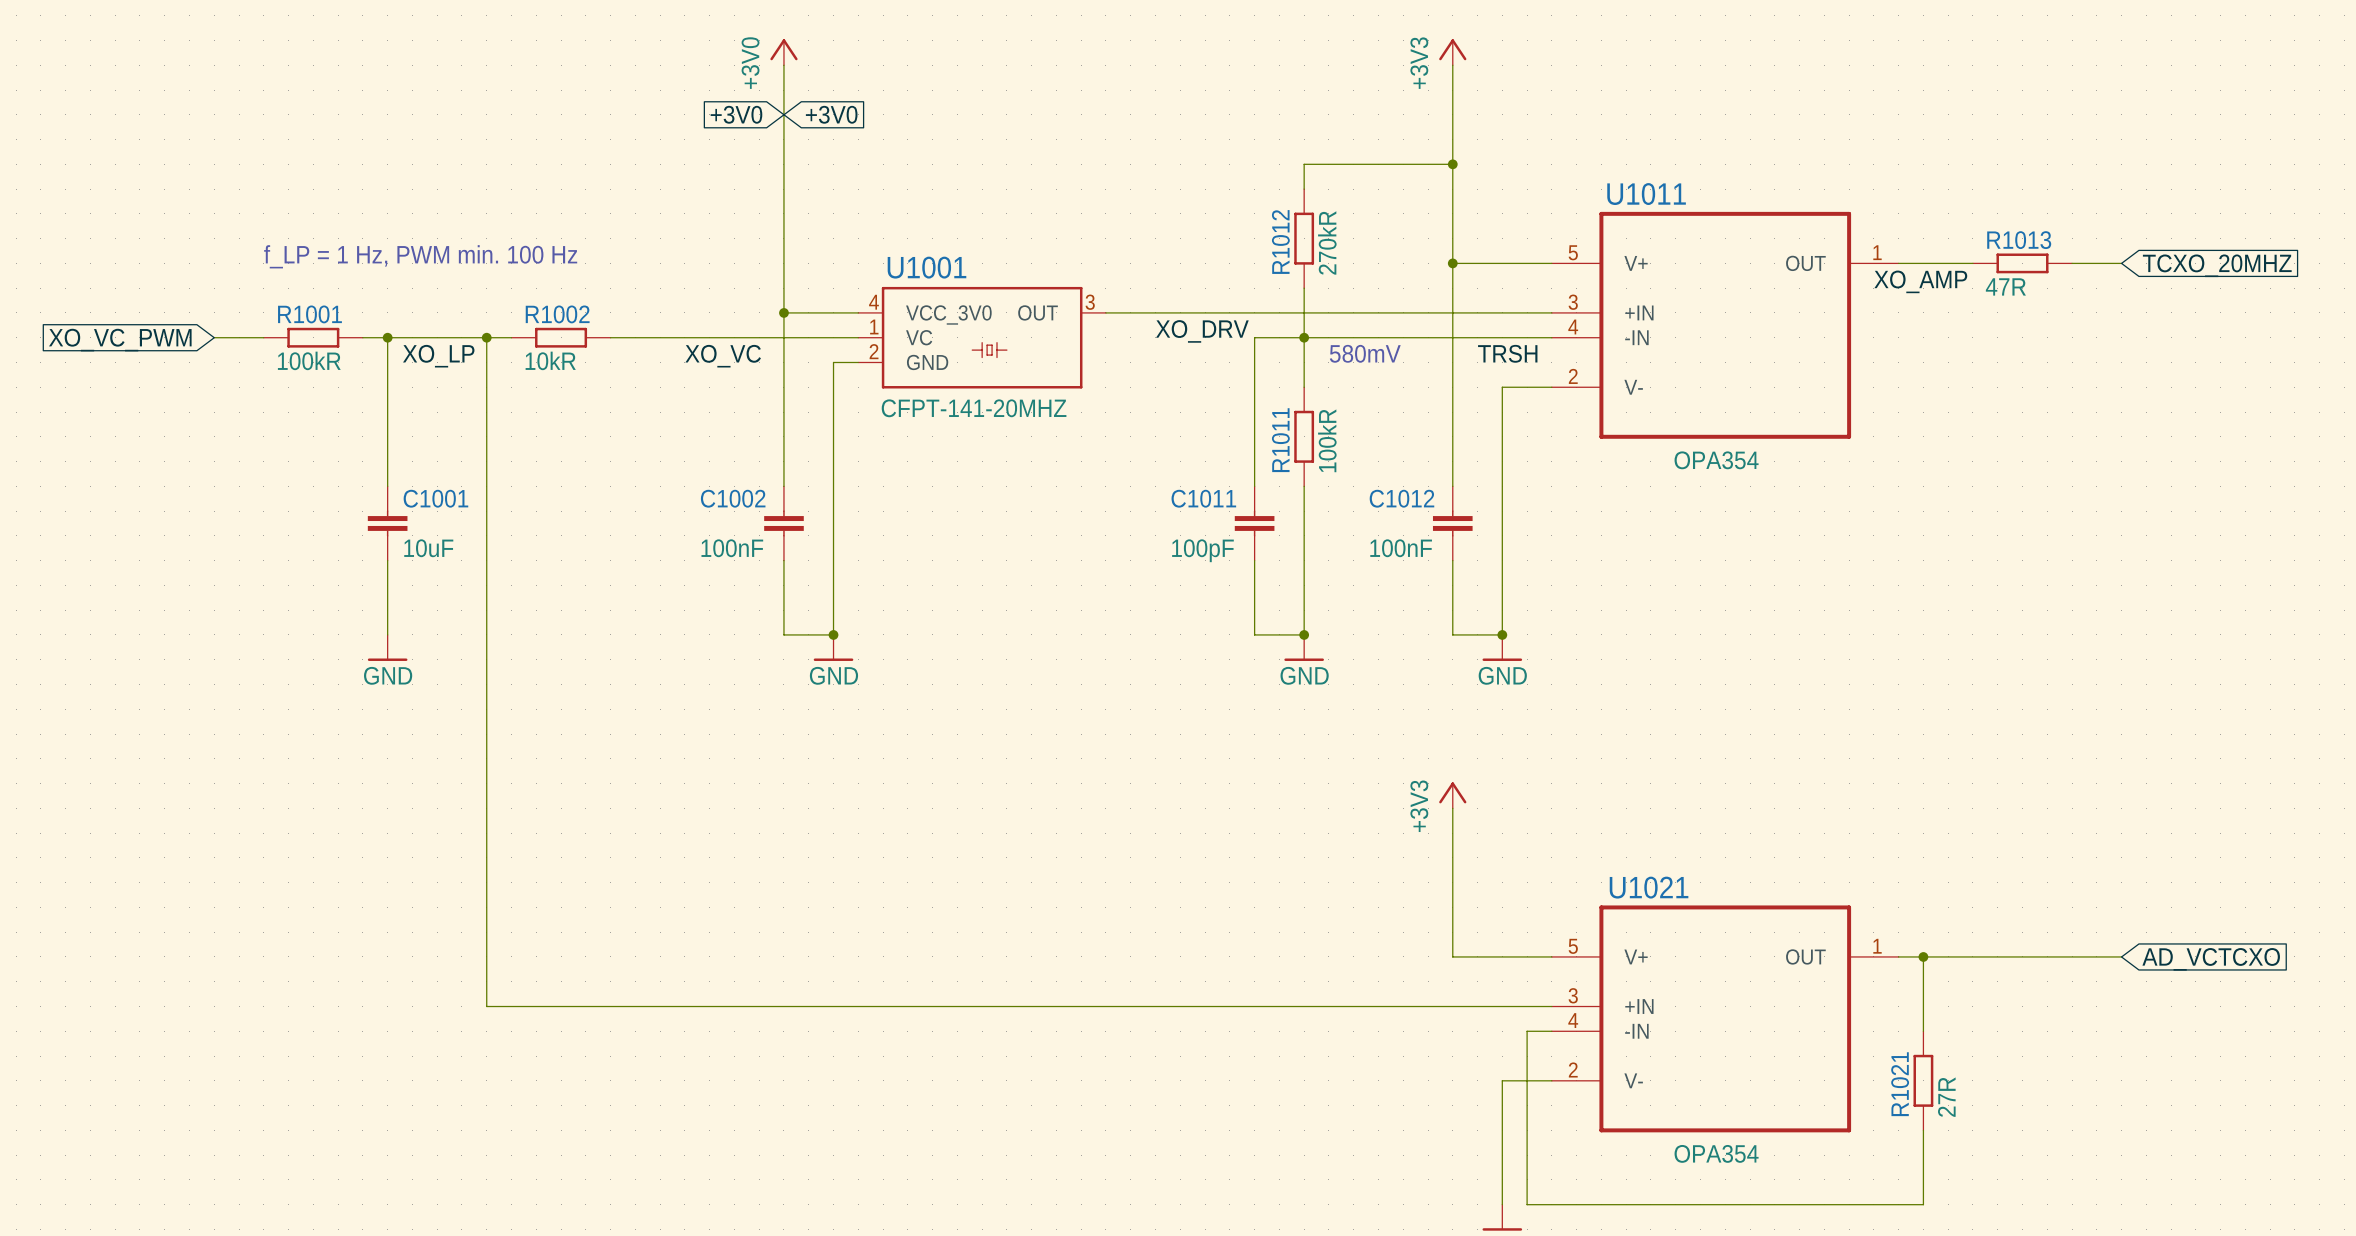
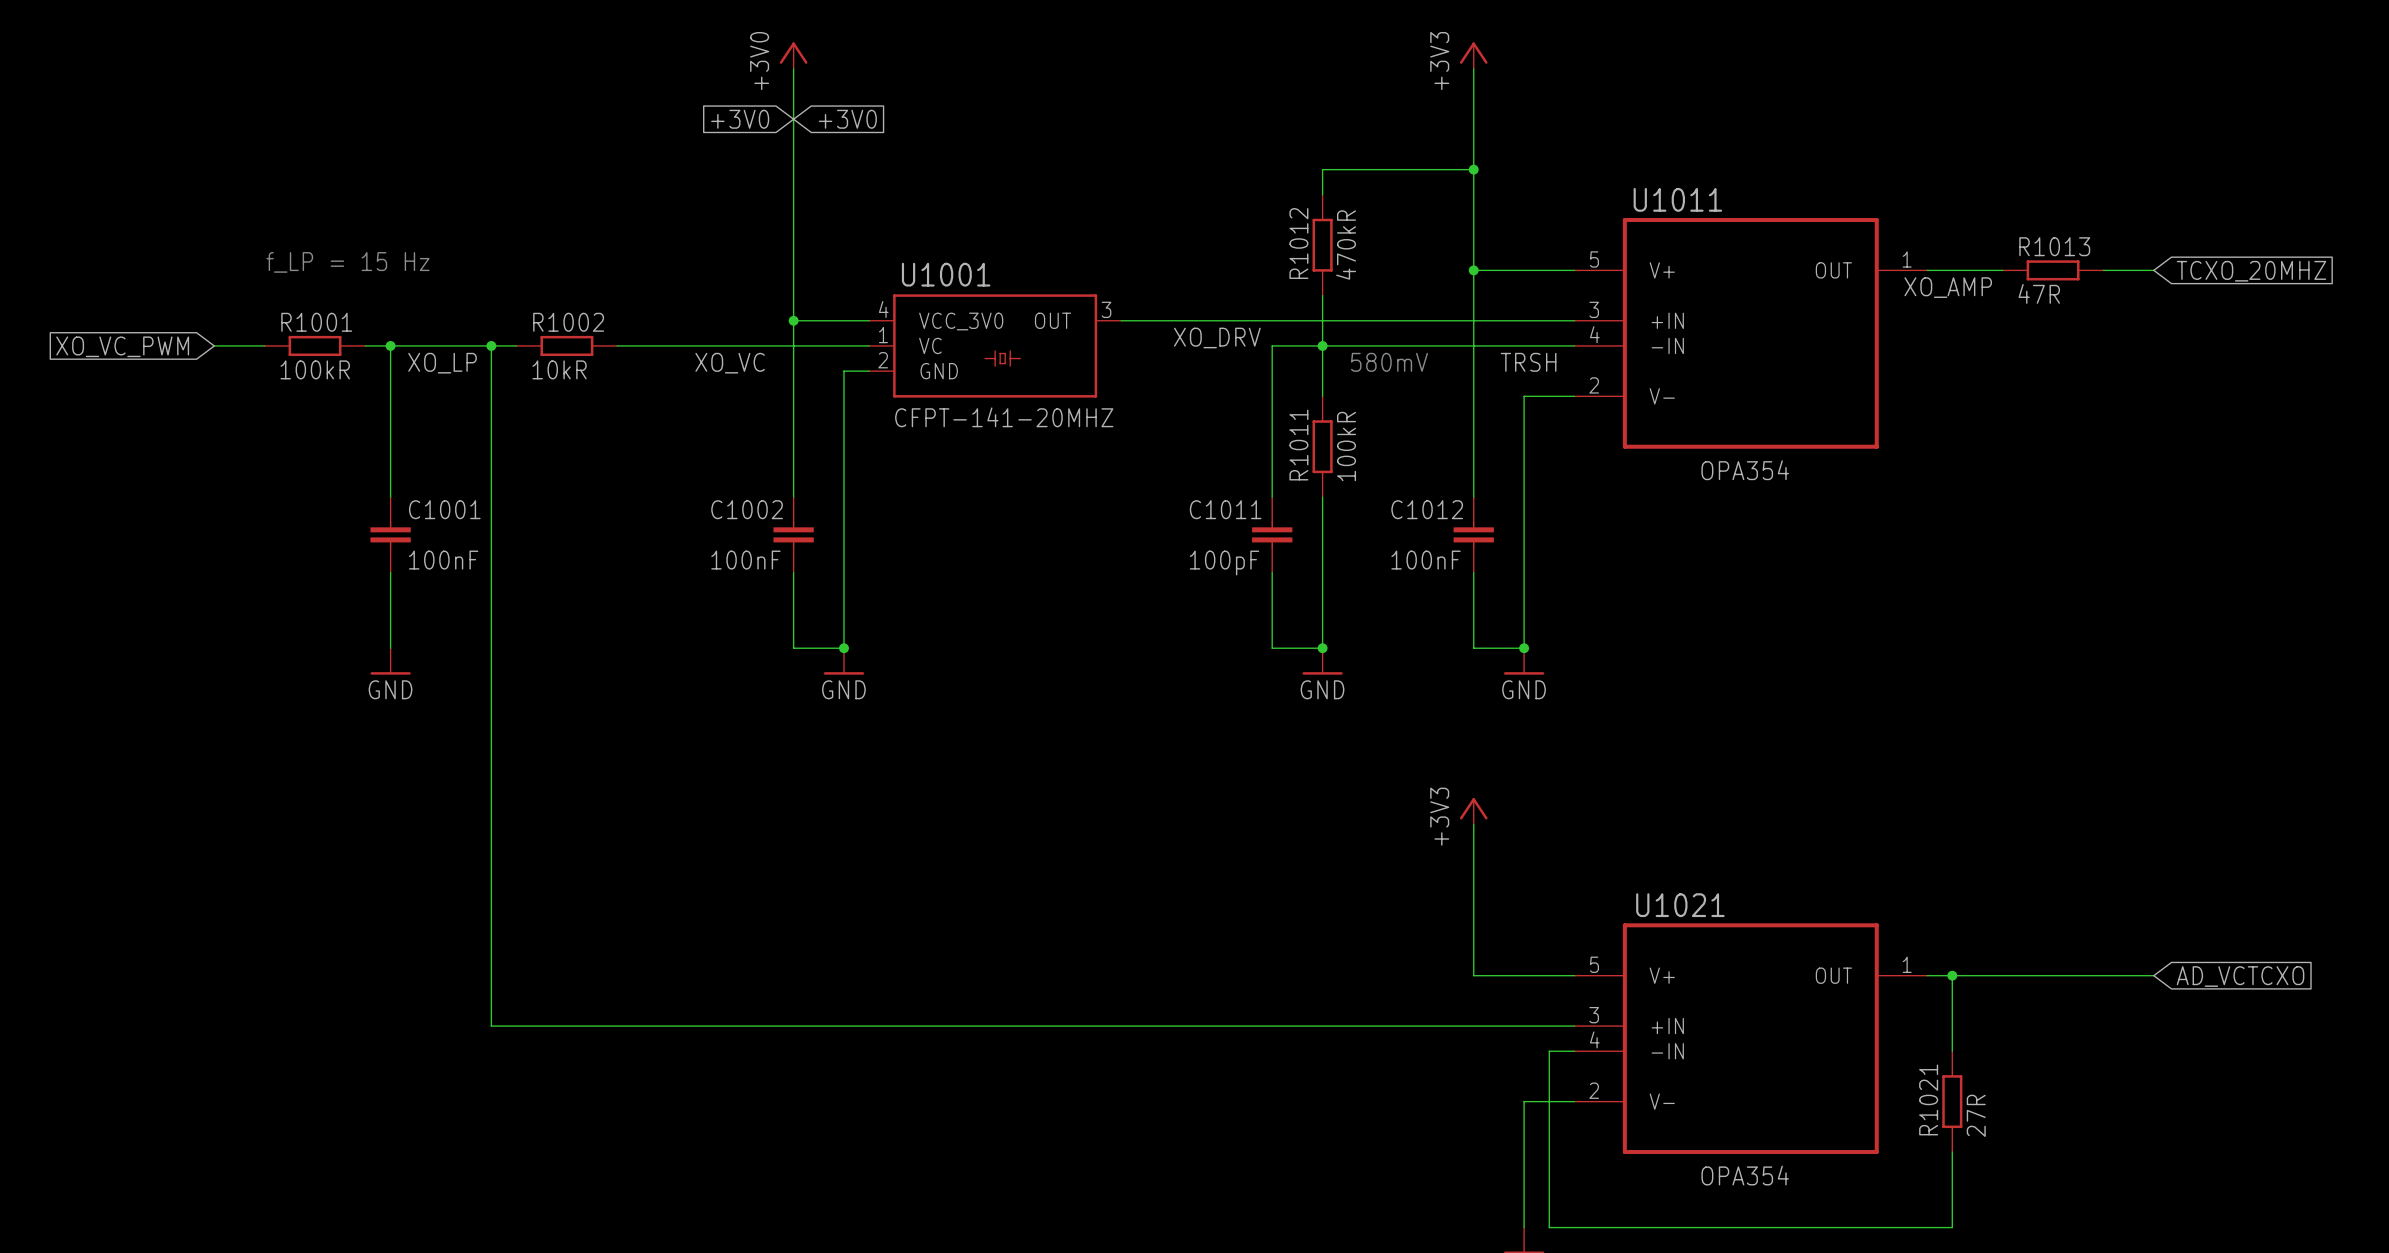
R1012 value: 270kR (1327, 242) -> 470kR (1346, 245)
text: f_LP = 1 Hz, PWM min. 100 Hz (420, 256) -> f_LP = 15 Hz (347, 262)
C1001 value: 10uF (428, 548) -> 100nF (443, 560)

